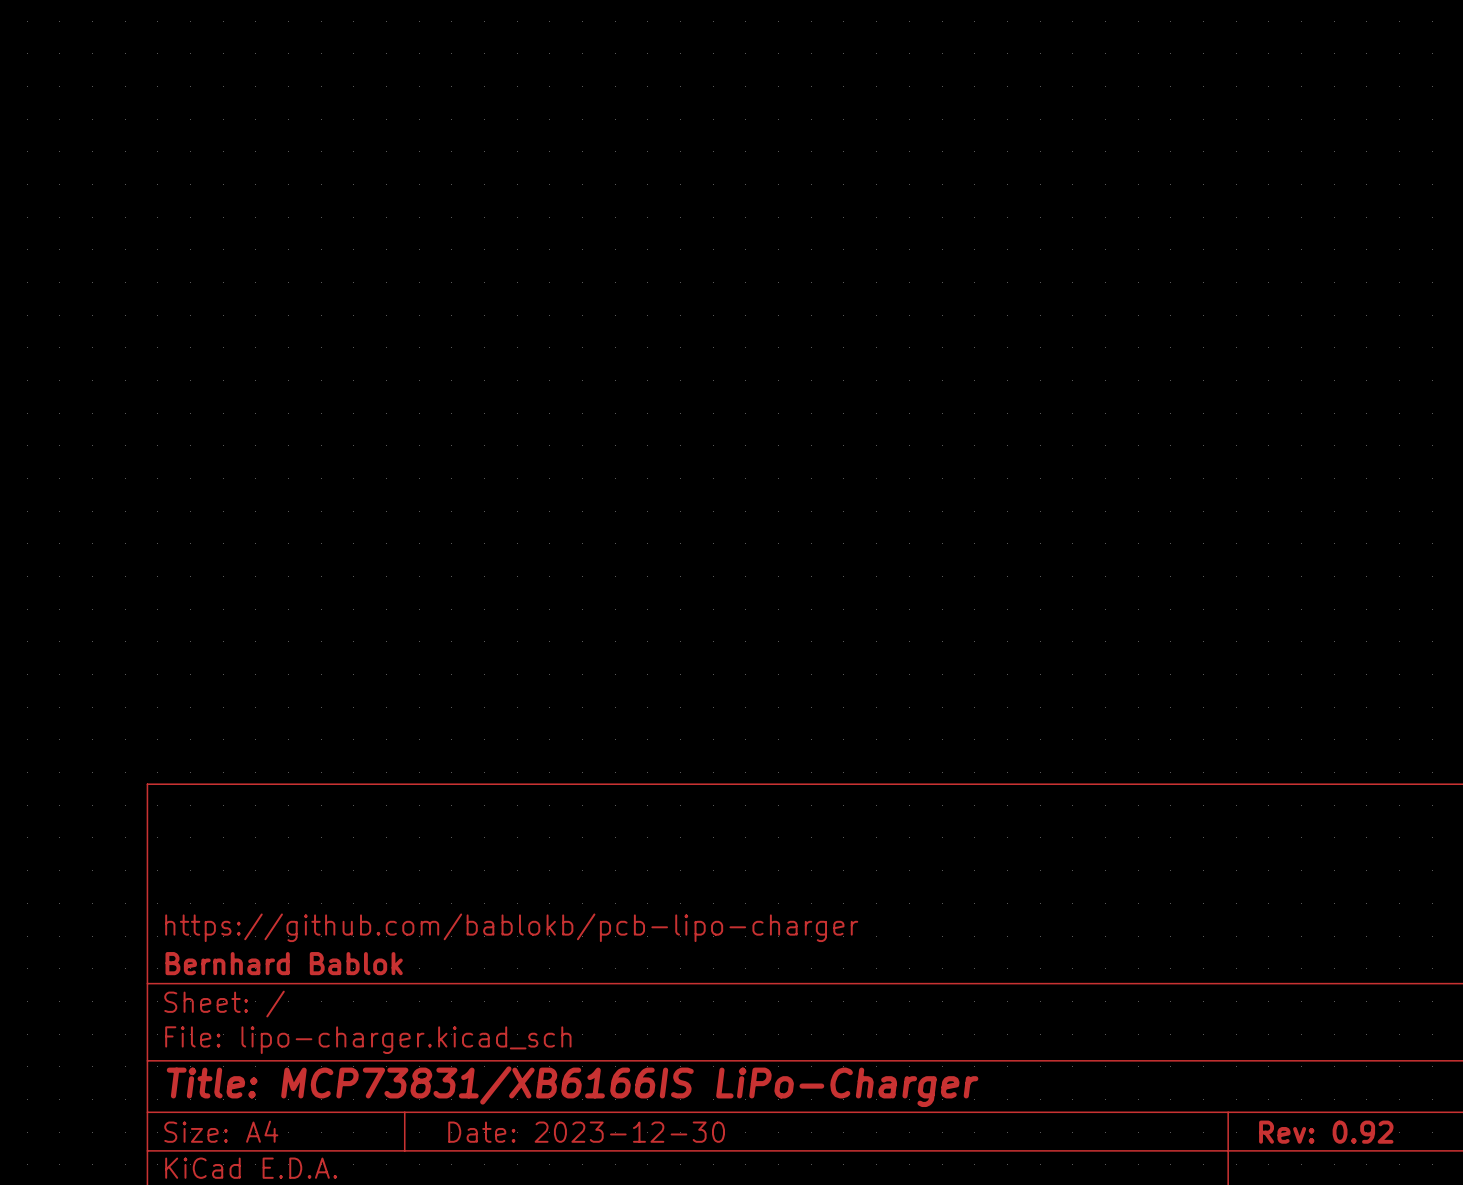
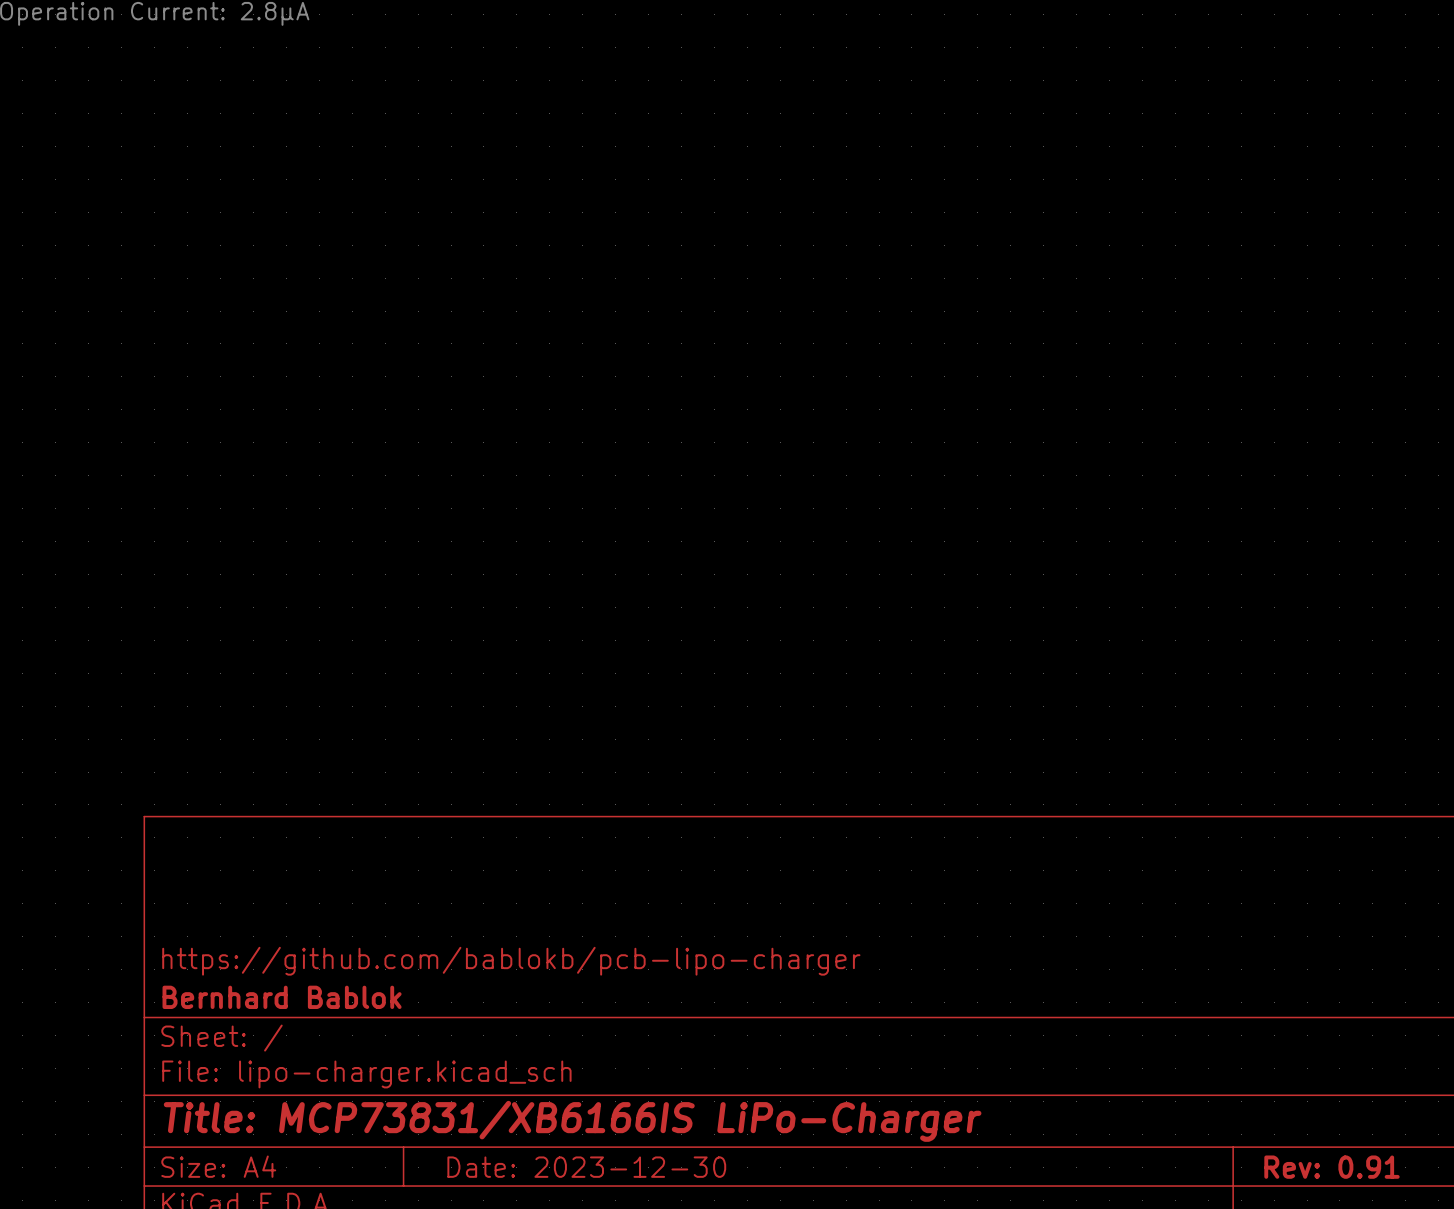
title block: Rev: 0.92 (1326, 1132) -> Rev: 0.91 (1331, 1167)

